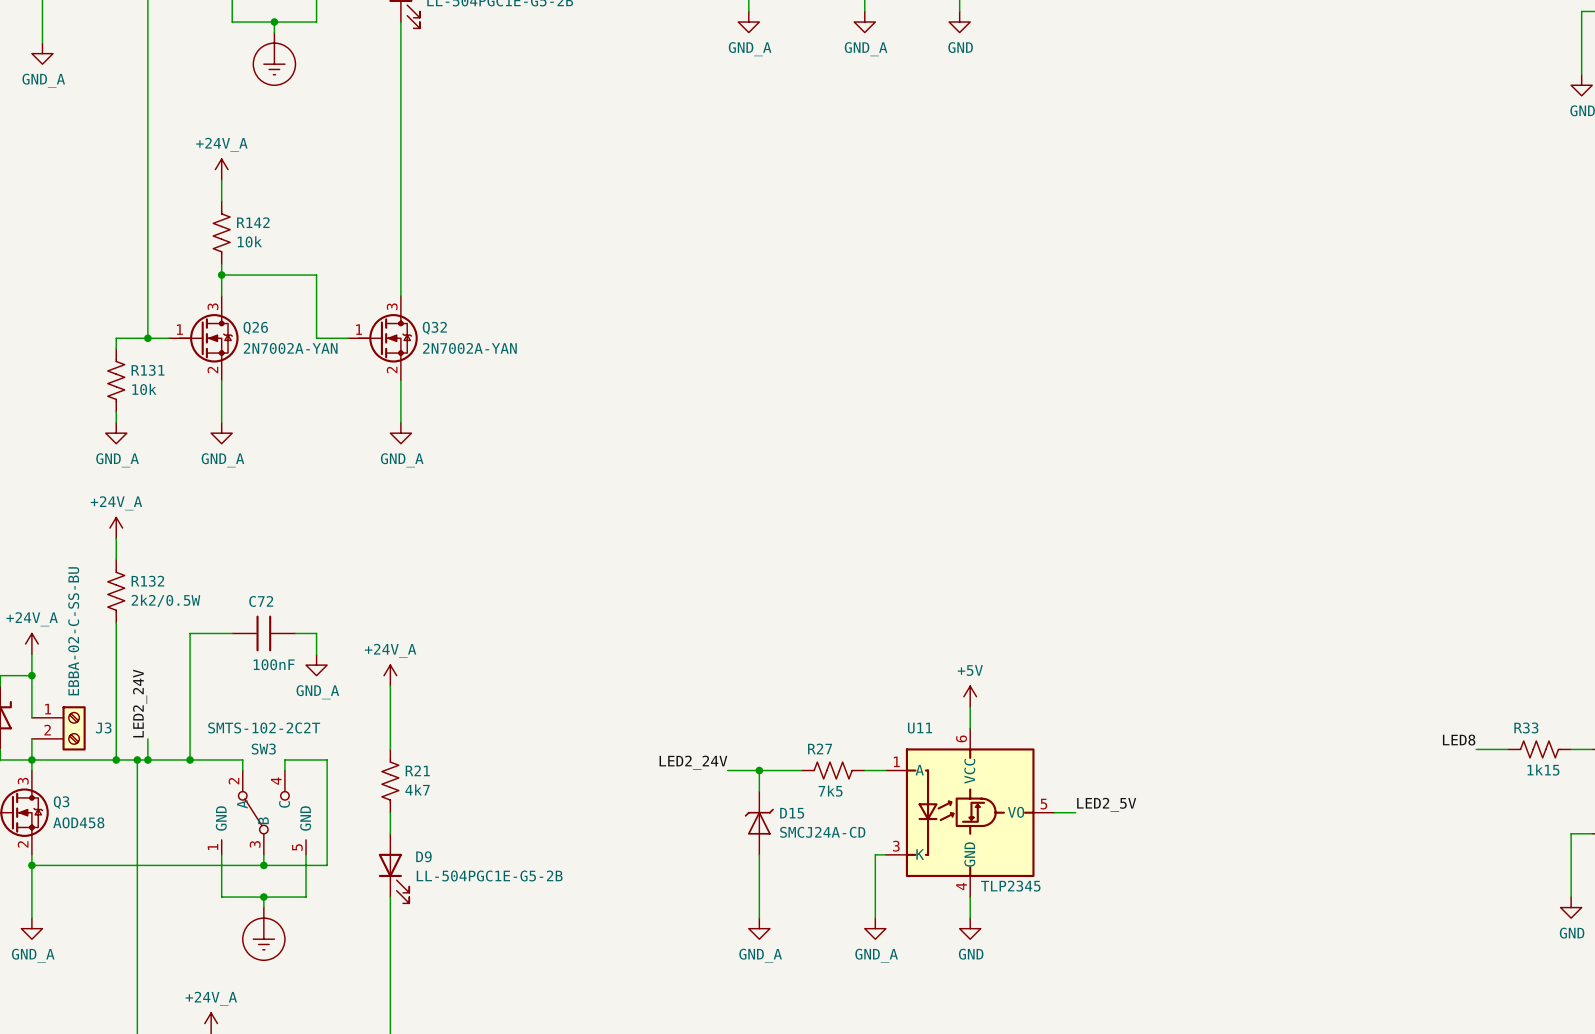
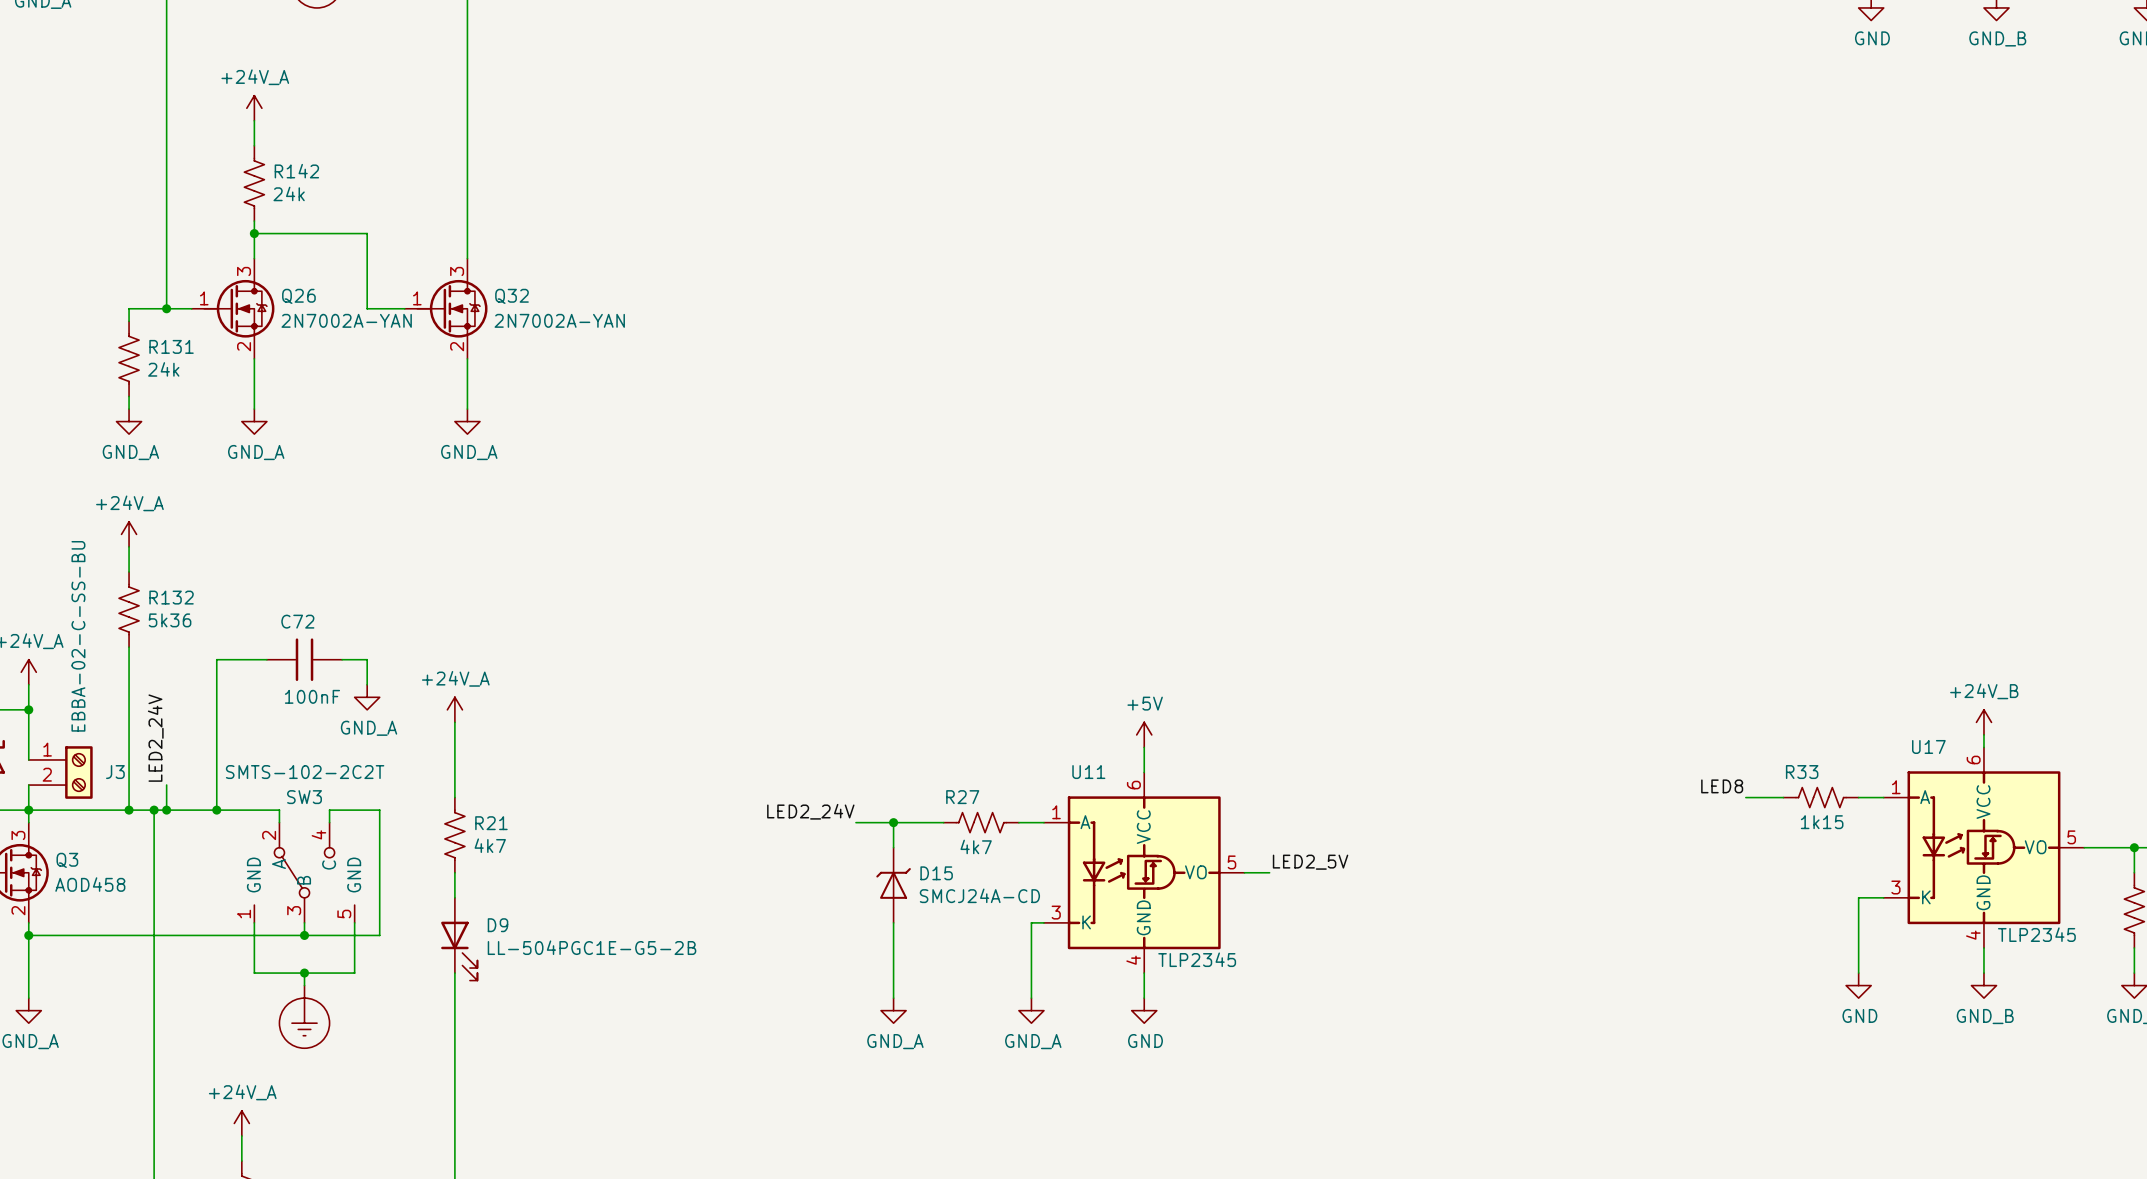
R142 value: 10k (249, 241) -> 24k (289, 193)
R131 value: 10k (144, 389) -> 24k (163, 369)
R132 value: 2k2/0.5W (165, 600) -> 5k36 (170, 620)
R27 value: 7k5 (830, 791) -> 4k7 (976, 846)

